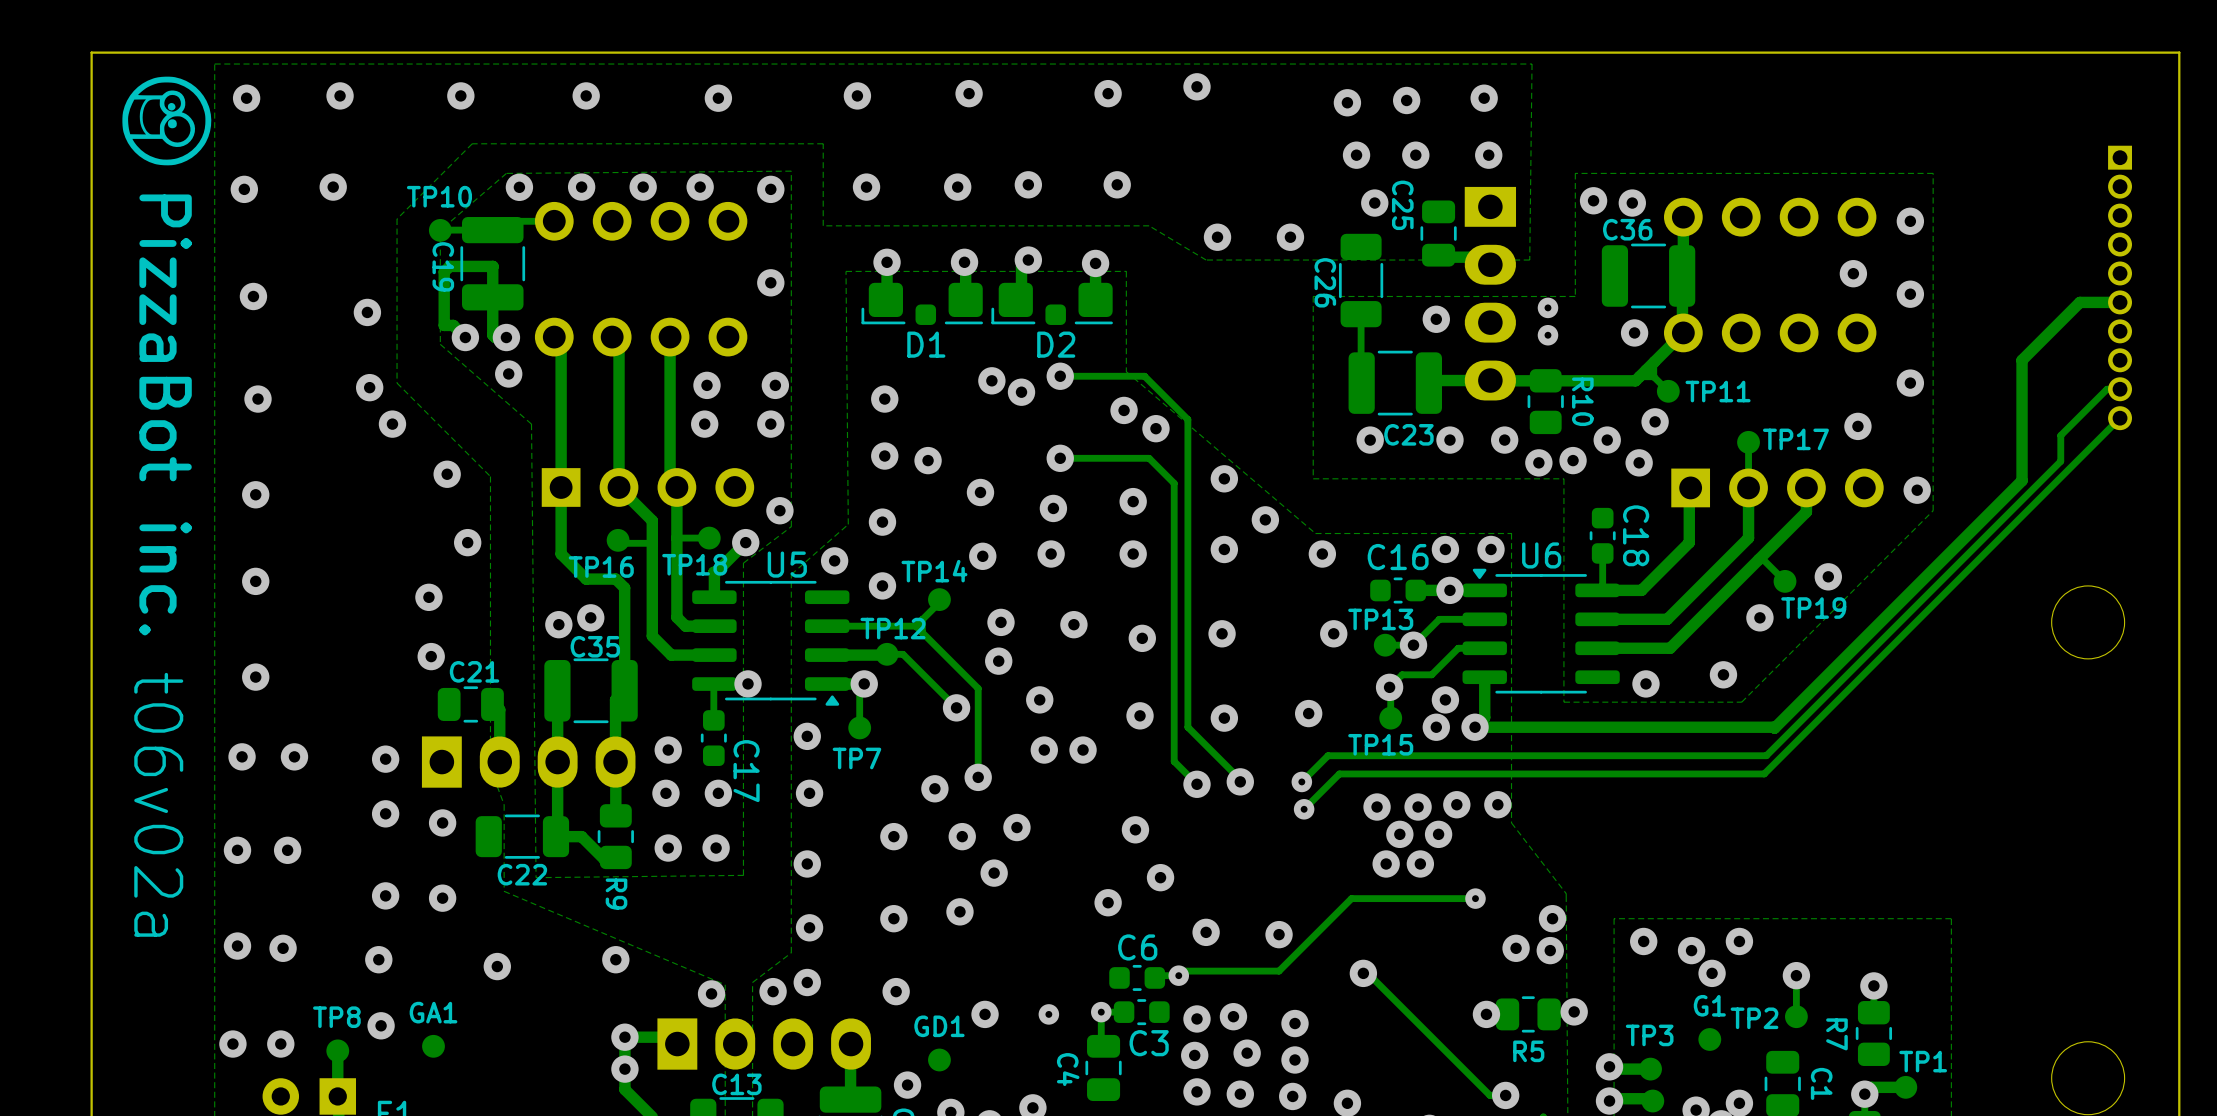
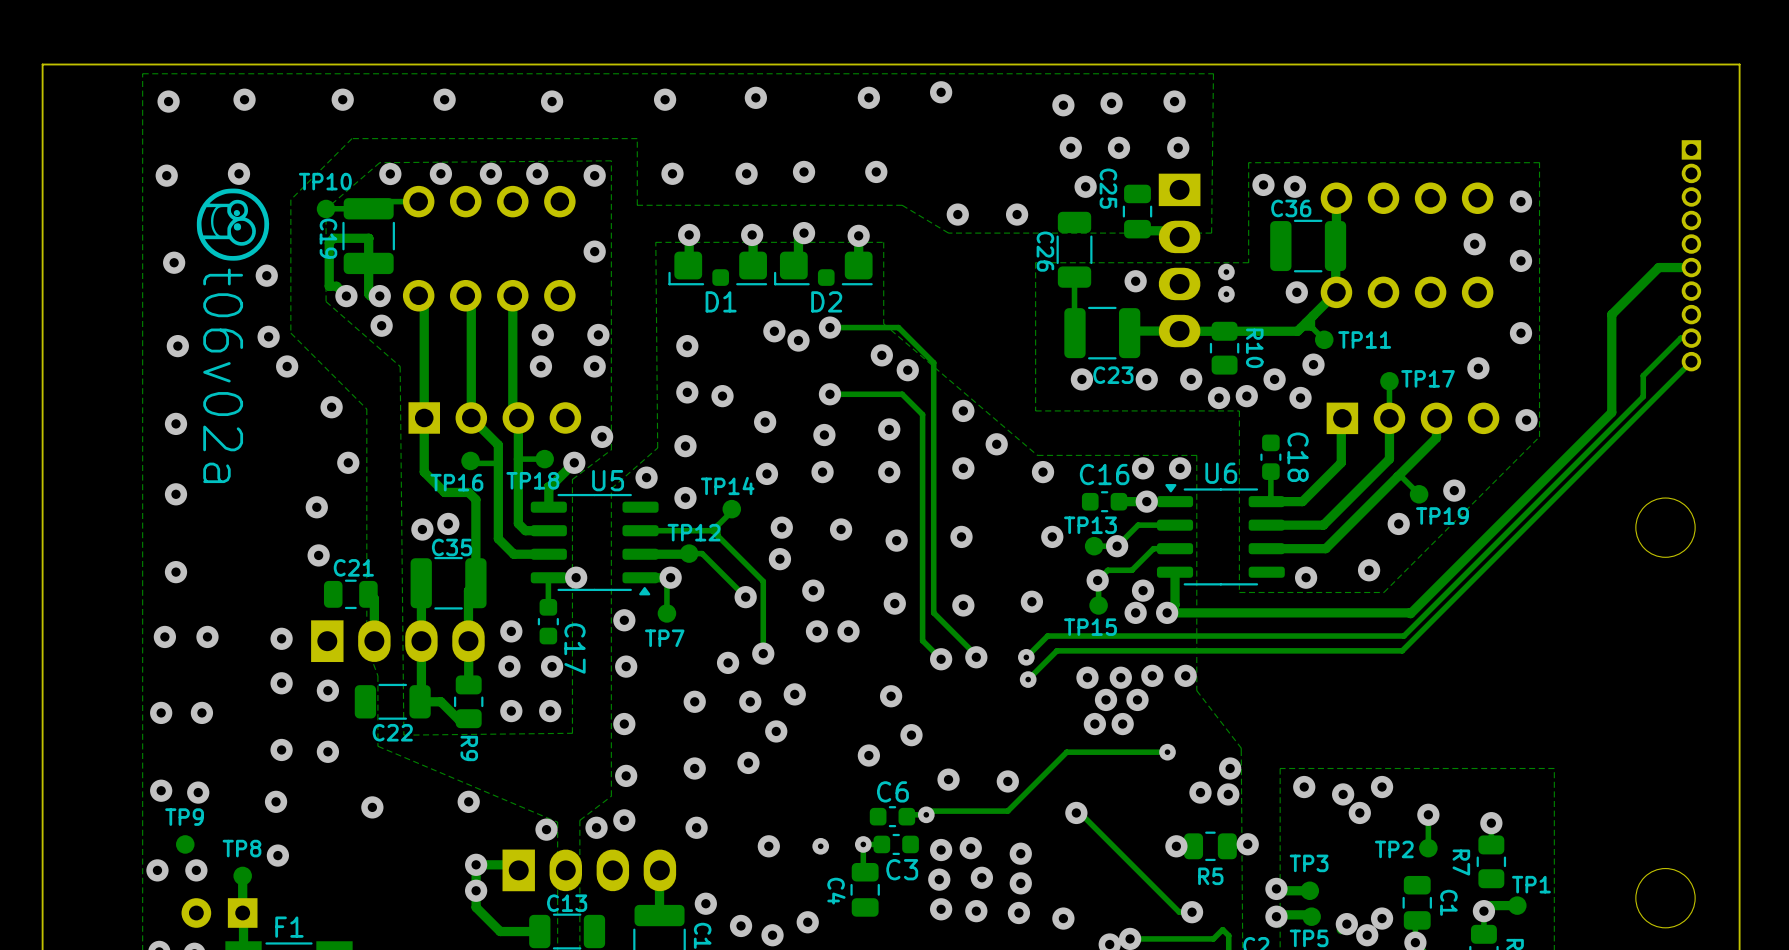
drawing position: (166, 121) -> (232, 224)
text: PizzaBot inc. (165, 414) -> none
text position: t06v02a (158, 804) -> t06v02a (223, 375)
TP9: none -> (185, 844)
G1: (1709, 1039) -> none
GA1: (433, 1046) -> none
GD1: (939, 1059) -> none

